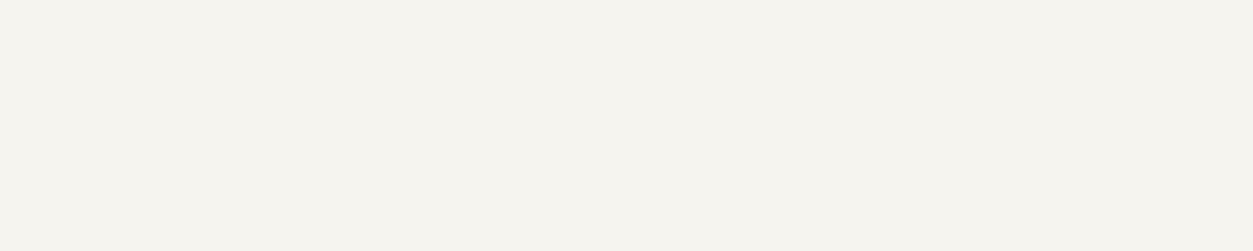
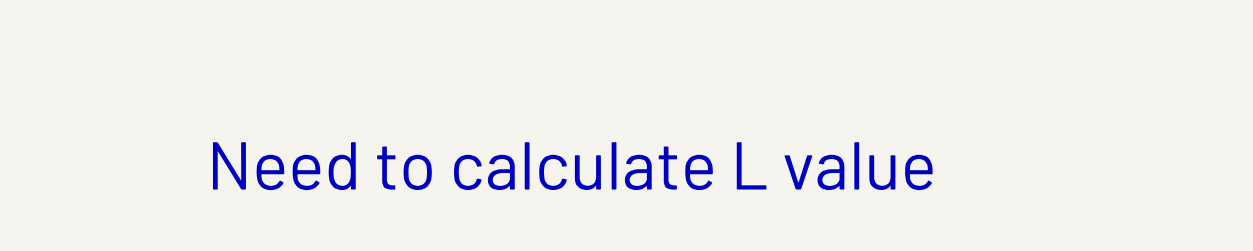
text: none -> Need to calculate L value (572, 166)

